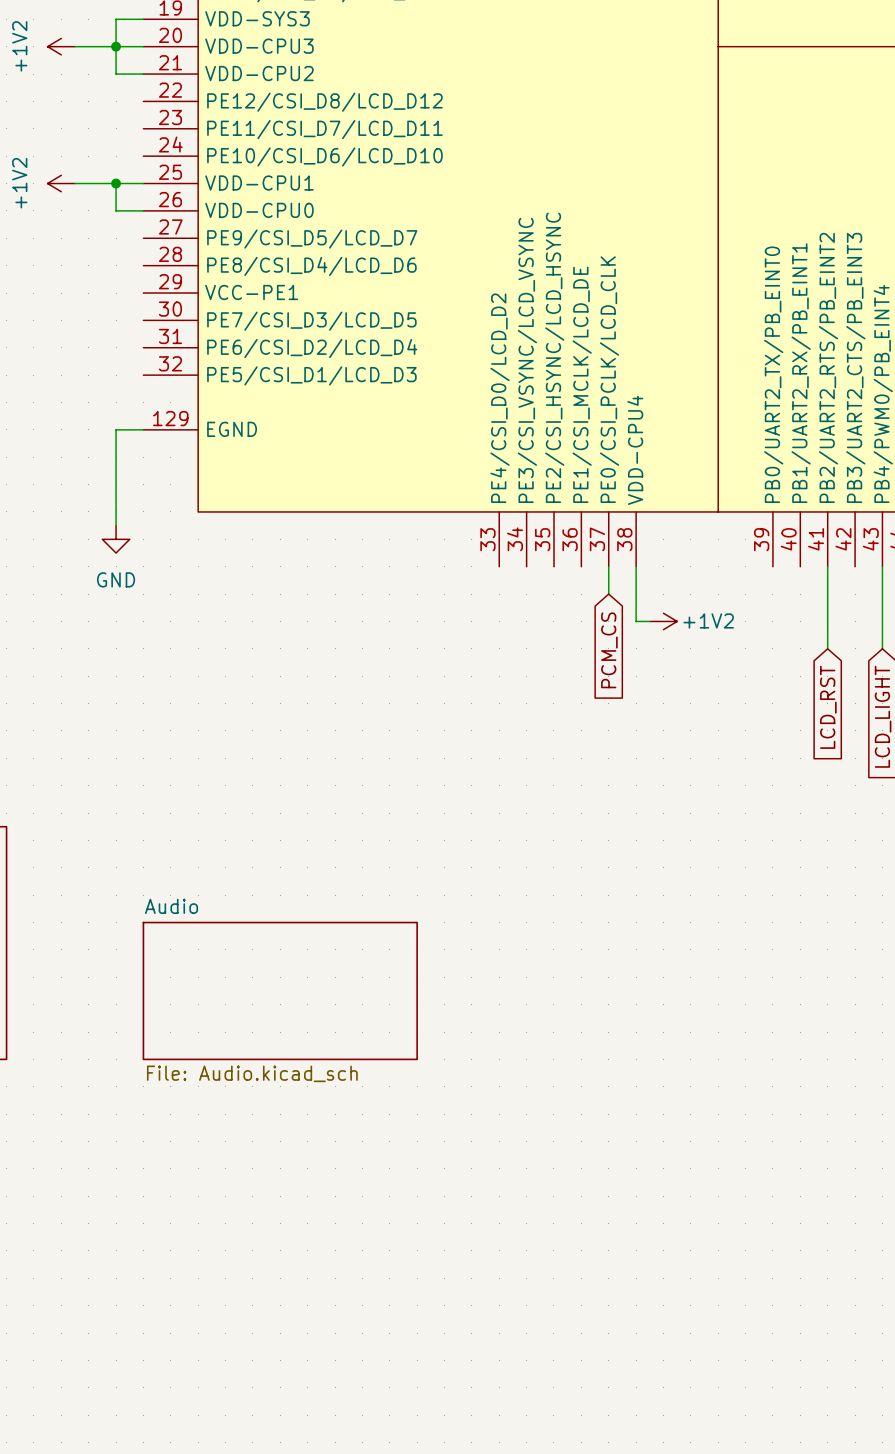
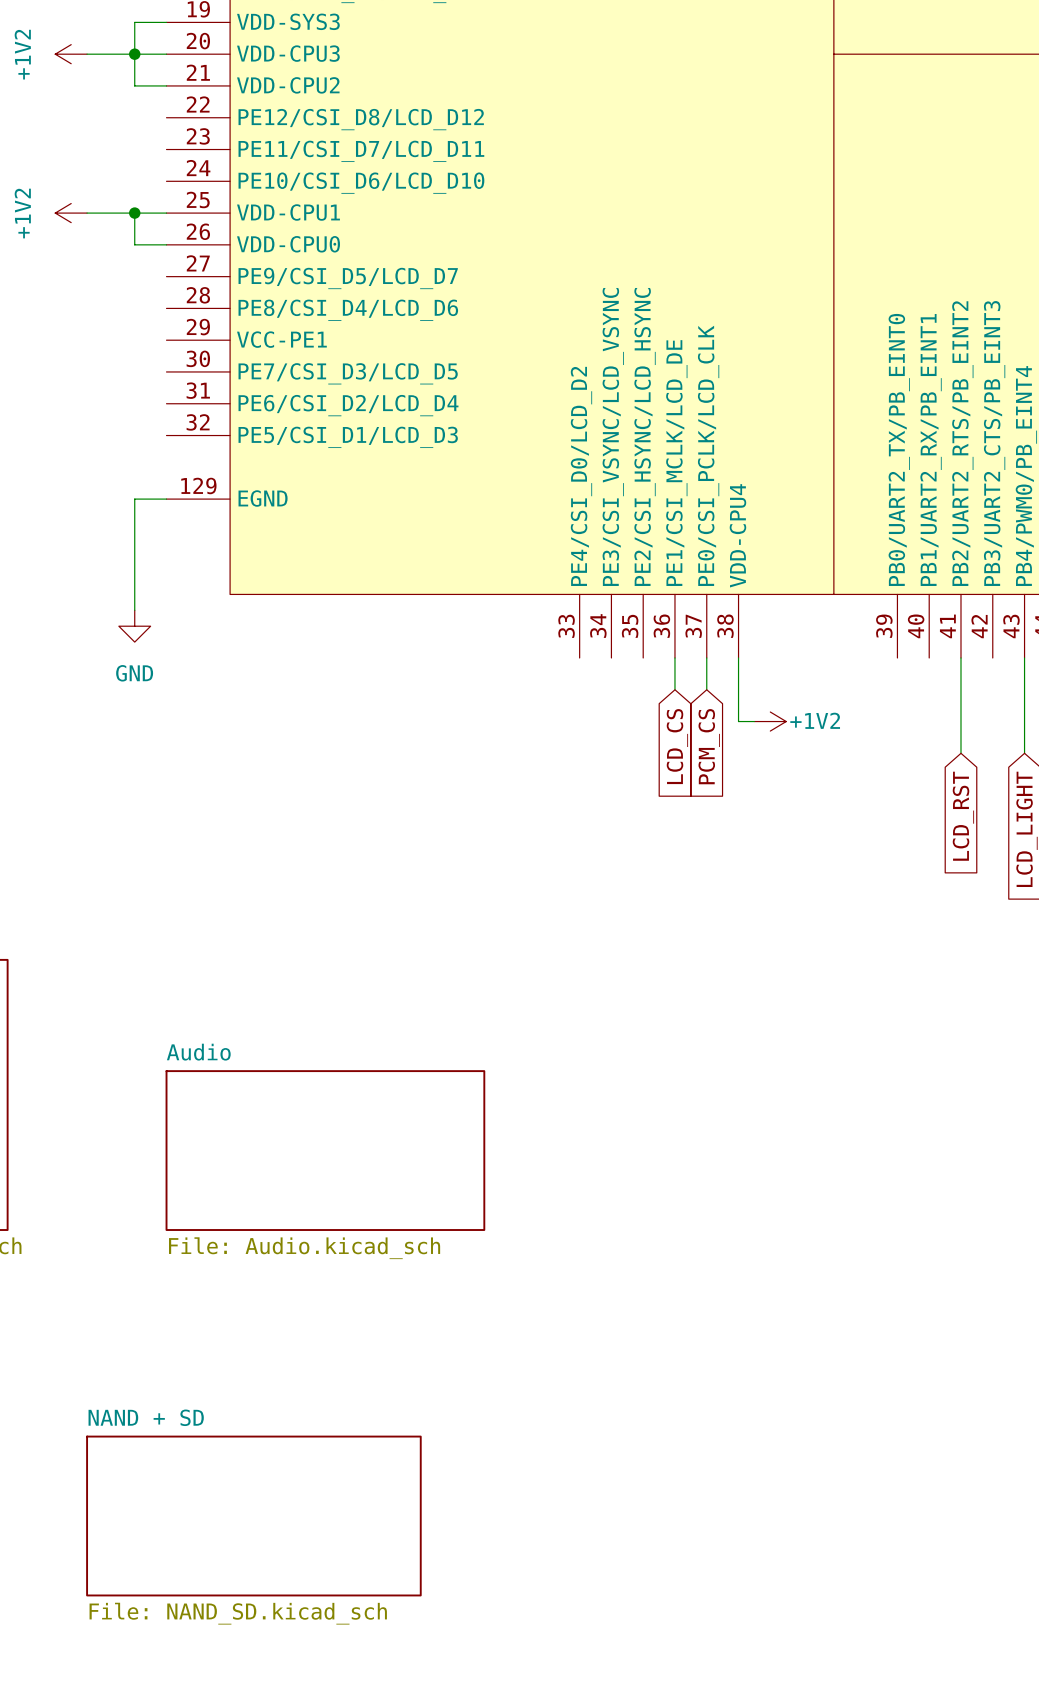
wire: none -> (674, 657) (674, 689)
global label: none -> LCD_CS (677, 746)
sheet NAND + SD: none -> File: NAND_SD.kicad_sch (253, 1516)

